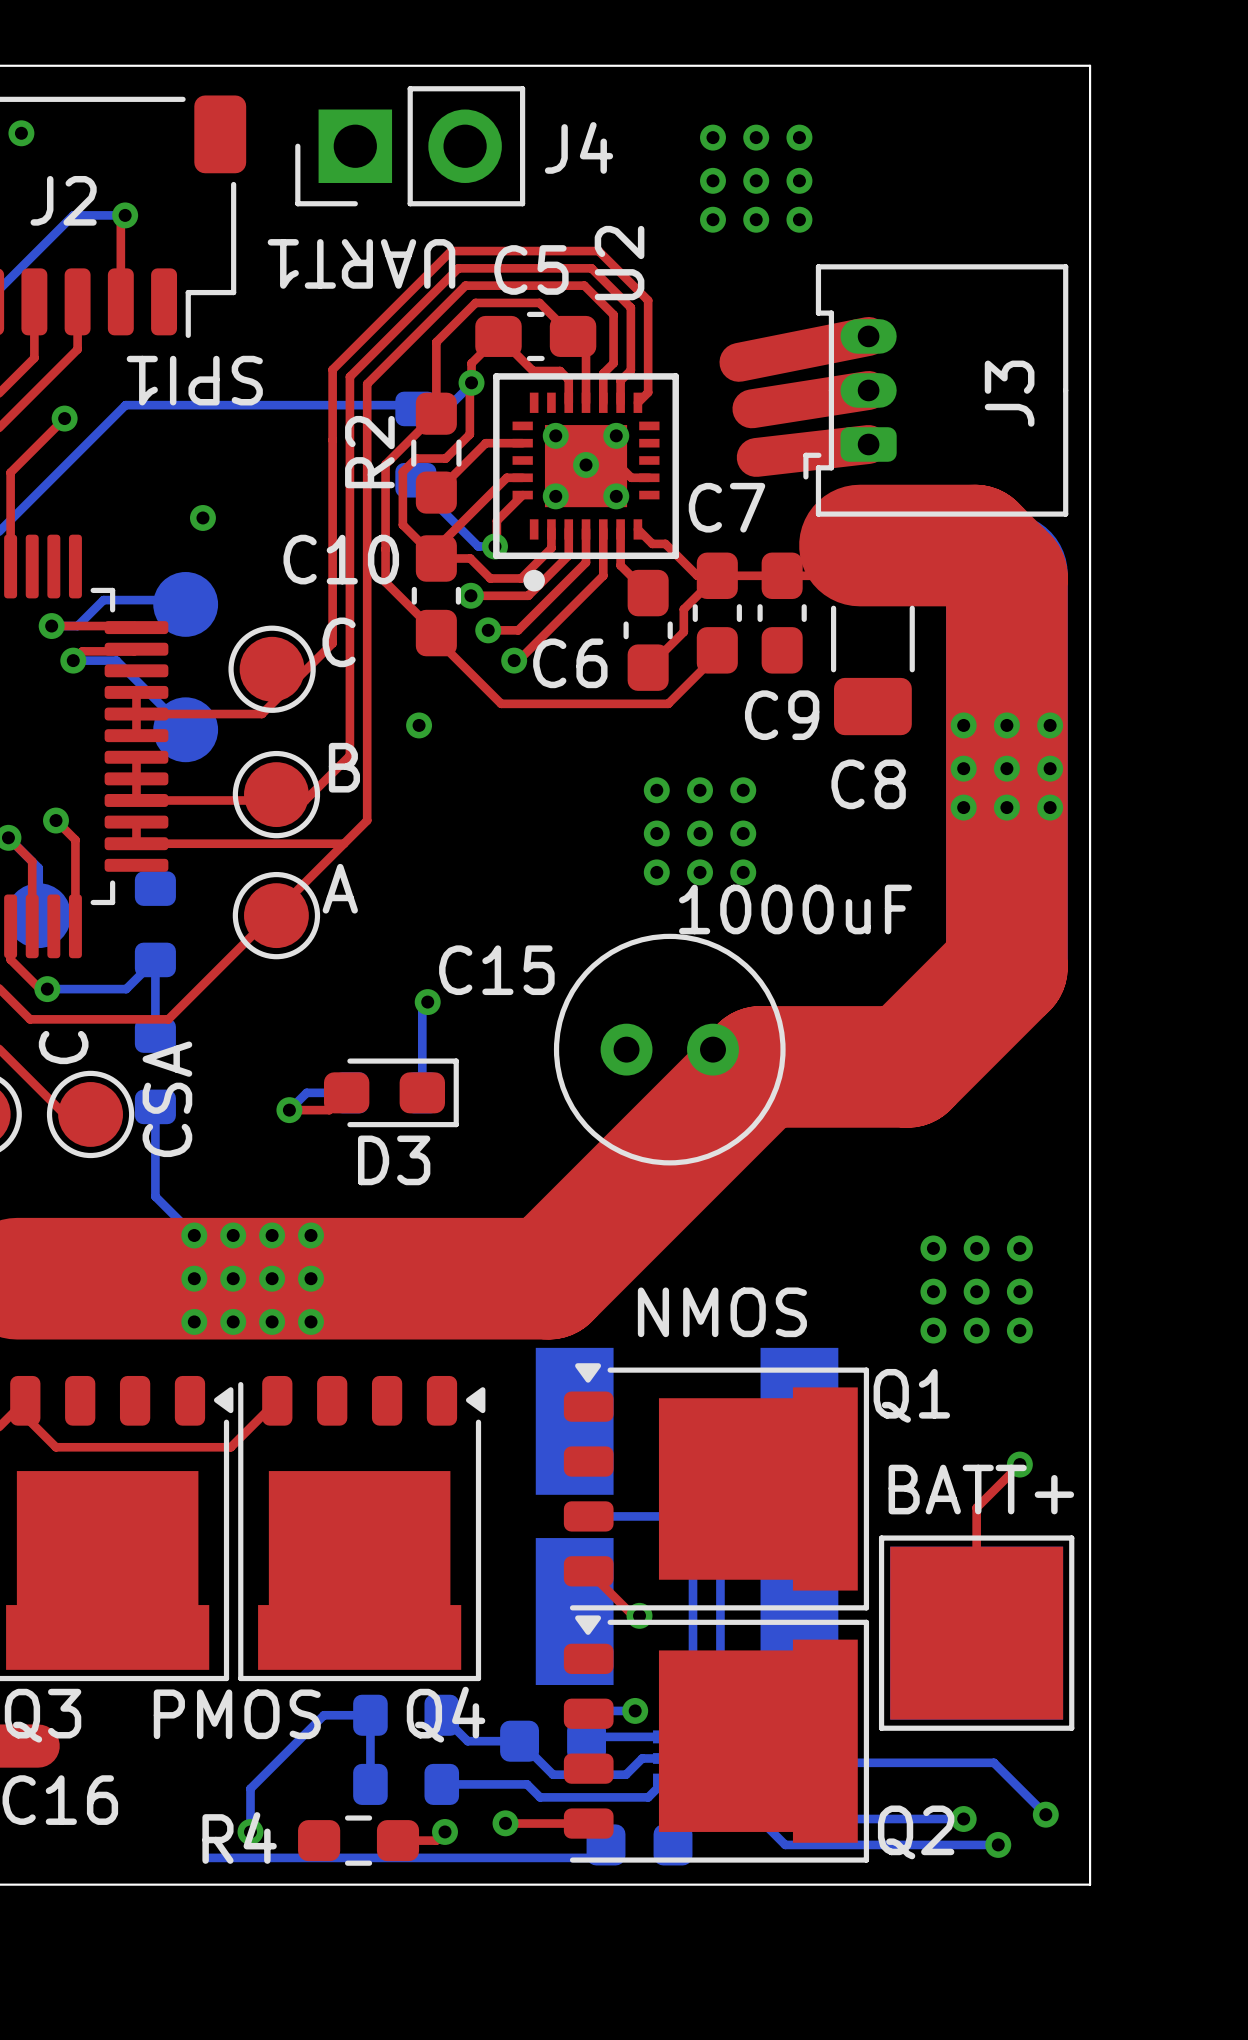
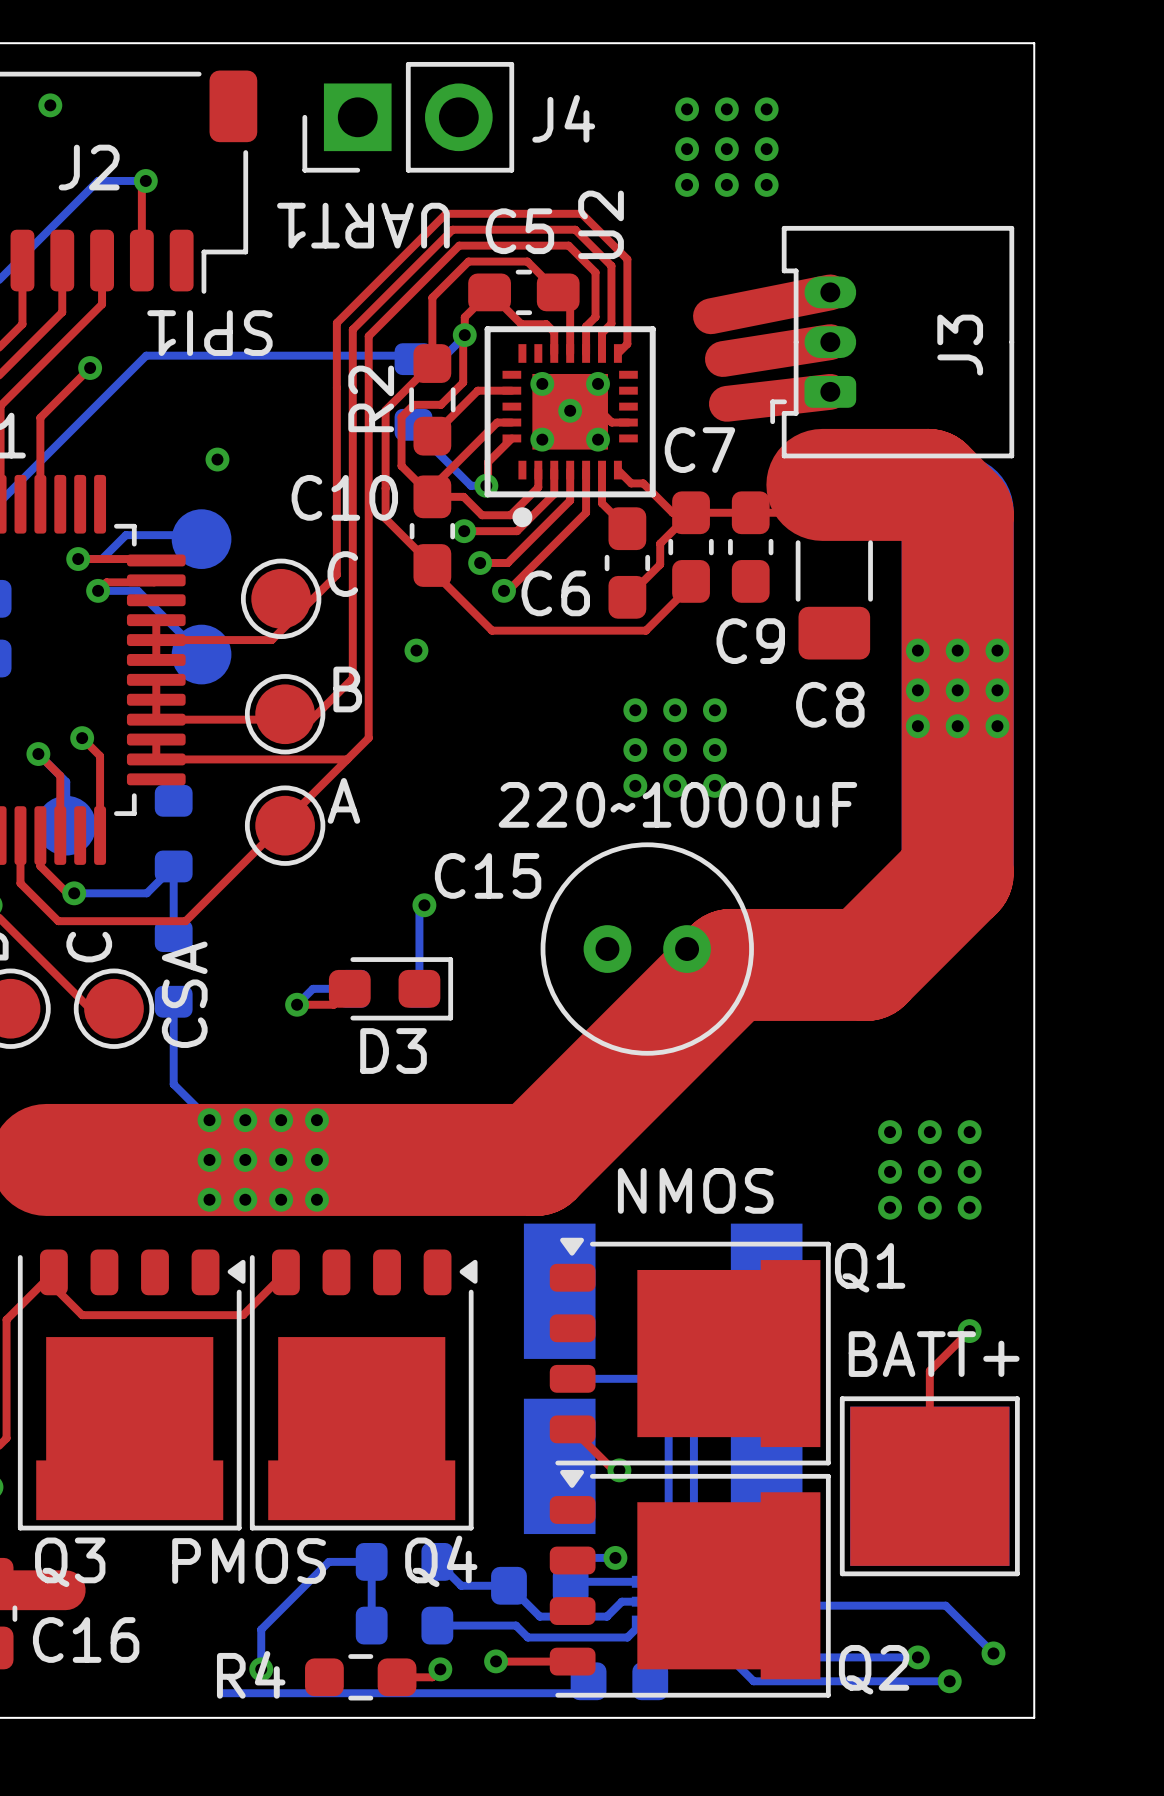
text: 1000uF (795, 909) -> 220~1000uF (677, 804)

